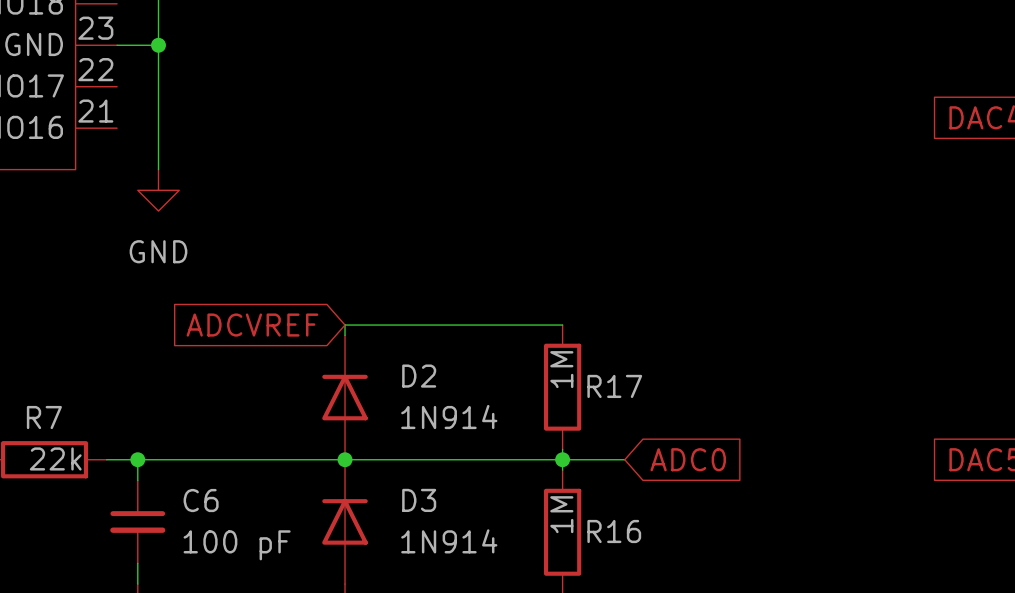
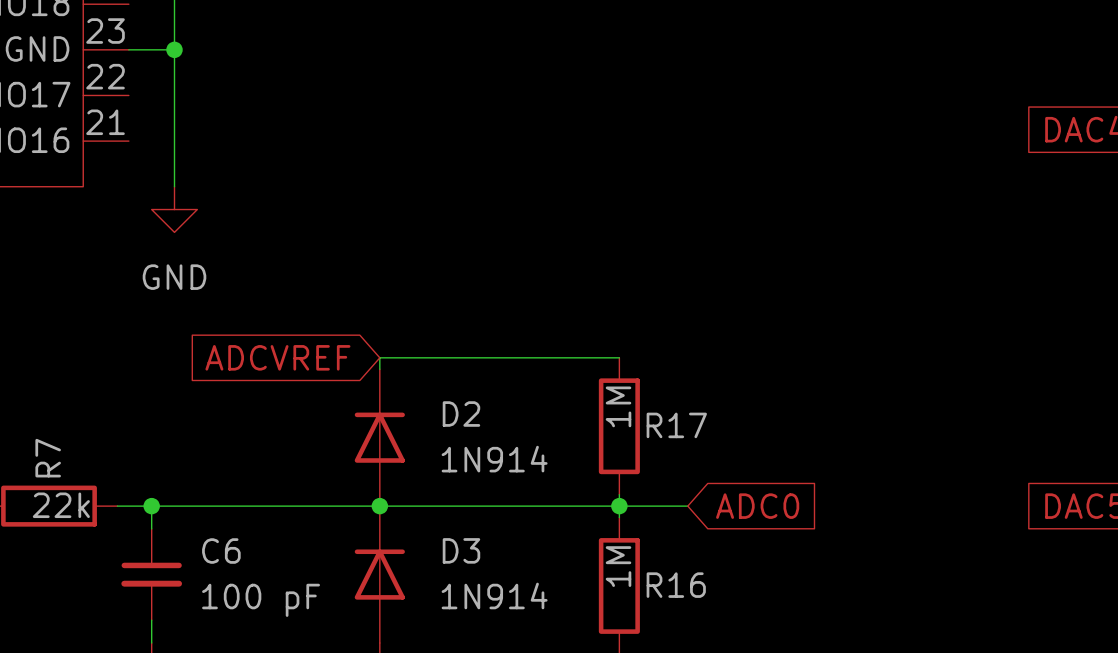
R7 name rotation: 0° (44, 417) -> 90° counterclockwise (48, 458)

